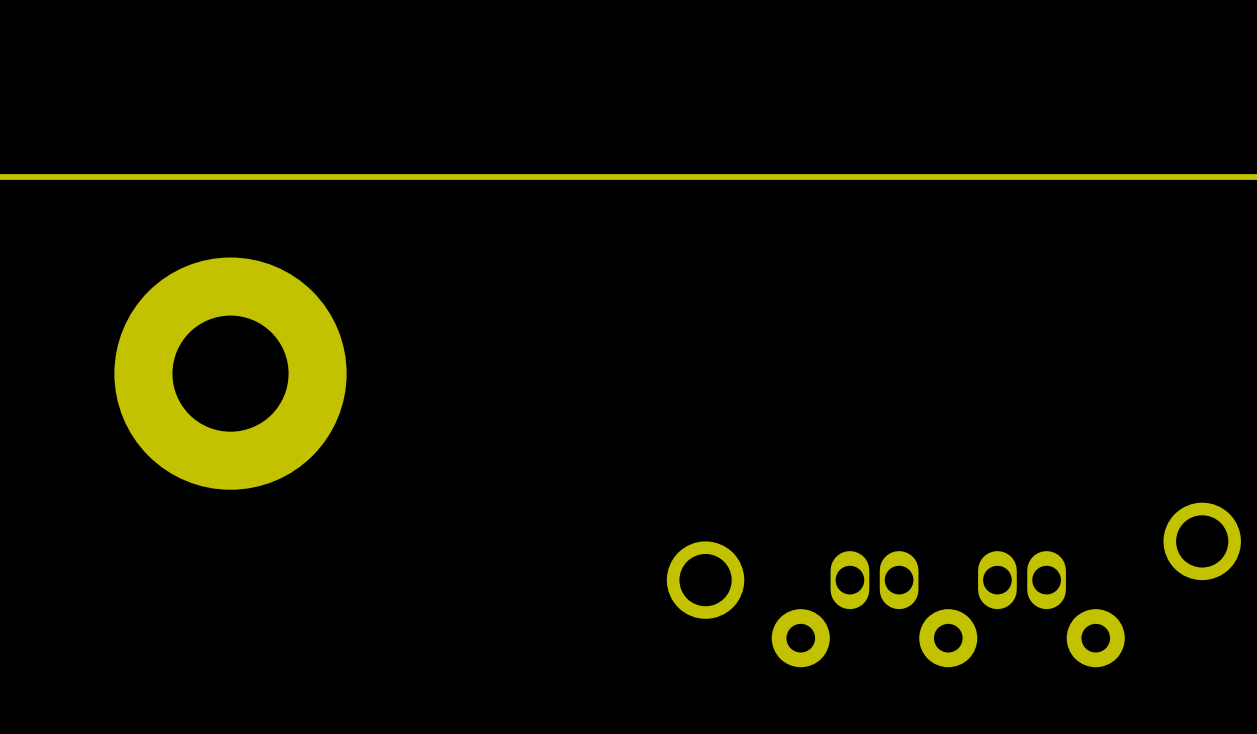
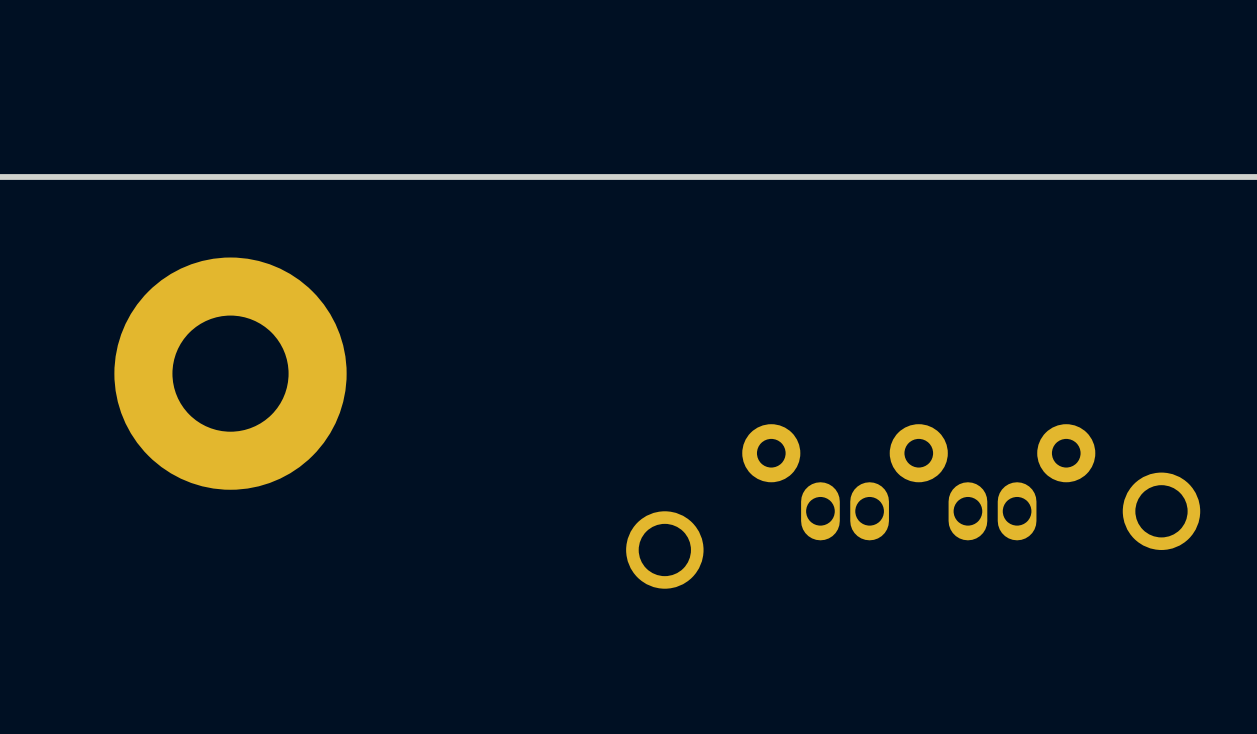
part rotation: 0° (953, 584) -> 180° (913, 506)

